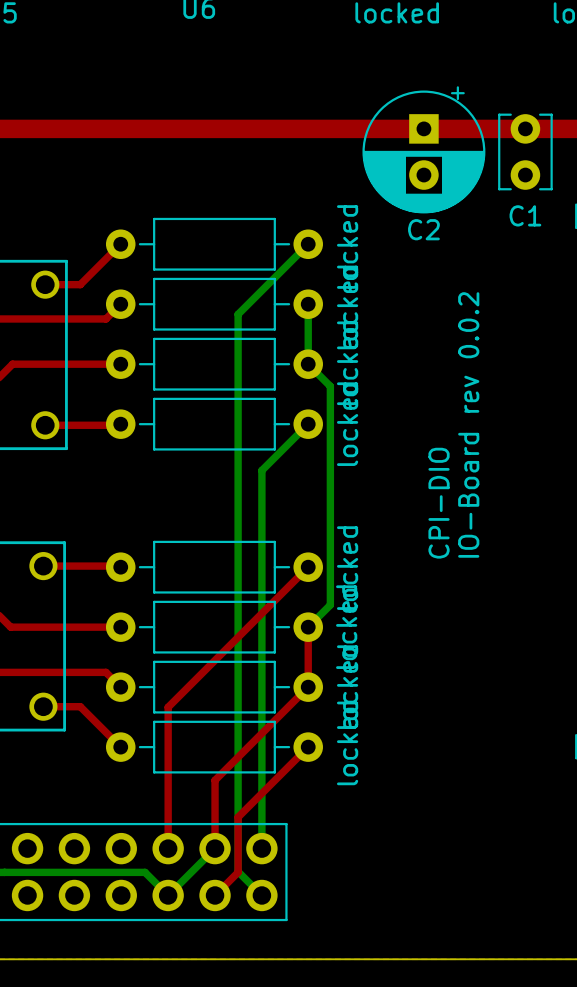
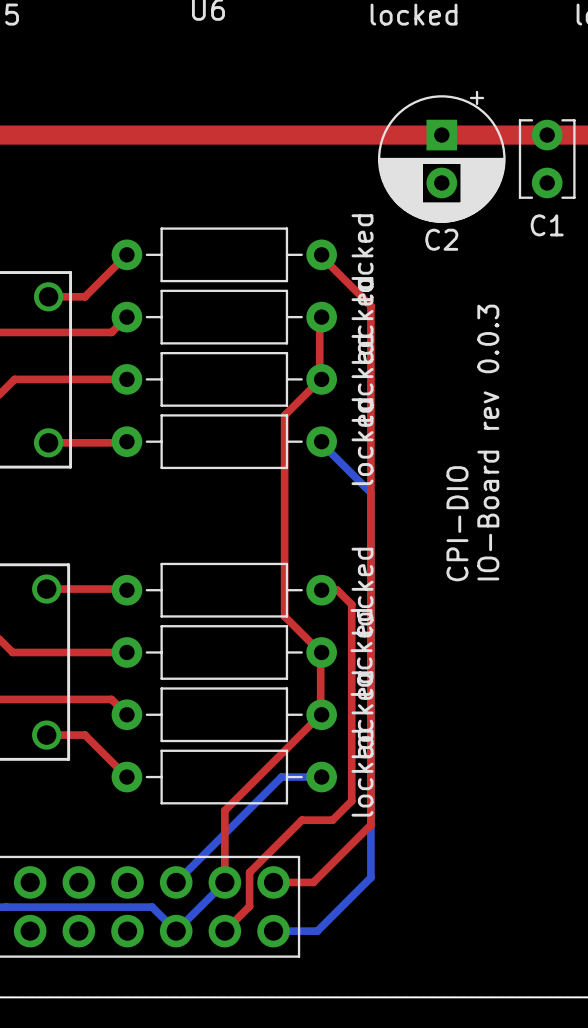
top track: none -> (319, 254) (370, 306) (370, 824) (313, 882) (273, 882)
bottom track: (308, 244) (238, 314) (238, 871) (261, 895) -> (319, 441) (370, 492) (370, 877) (317, 931) (273, 931)
bottom track: (308, 304) (308, 364) (330, 386) (330, 605) (308, 627) -> none
bottom track: (308, 424) (261, 470) (261, 848) -> none
text: IO-Board rev 0.0.2 (468, 424) -> IO-Board rev 0.0.3 (488, 442)
top track: (308, 567) (168, 707) (168, 848) -> none
top track: (308, 627) (308, 687) (215, 780) -> (319, 317) (320, 379) (284, 415) (284, 616) (320, 652) (320, 714) (224, 811)
bottom track: none -> (320, 777) (281, 777) (176, 882)
top track: (308, 747) (238, 817) (238, 872) -> (319, 590) (337, 590) (351, 604) (351, 800) (332, 820) (301, 820) (249, 872) (248, 907)

